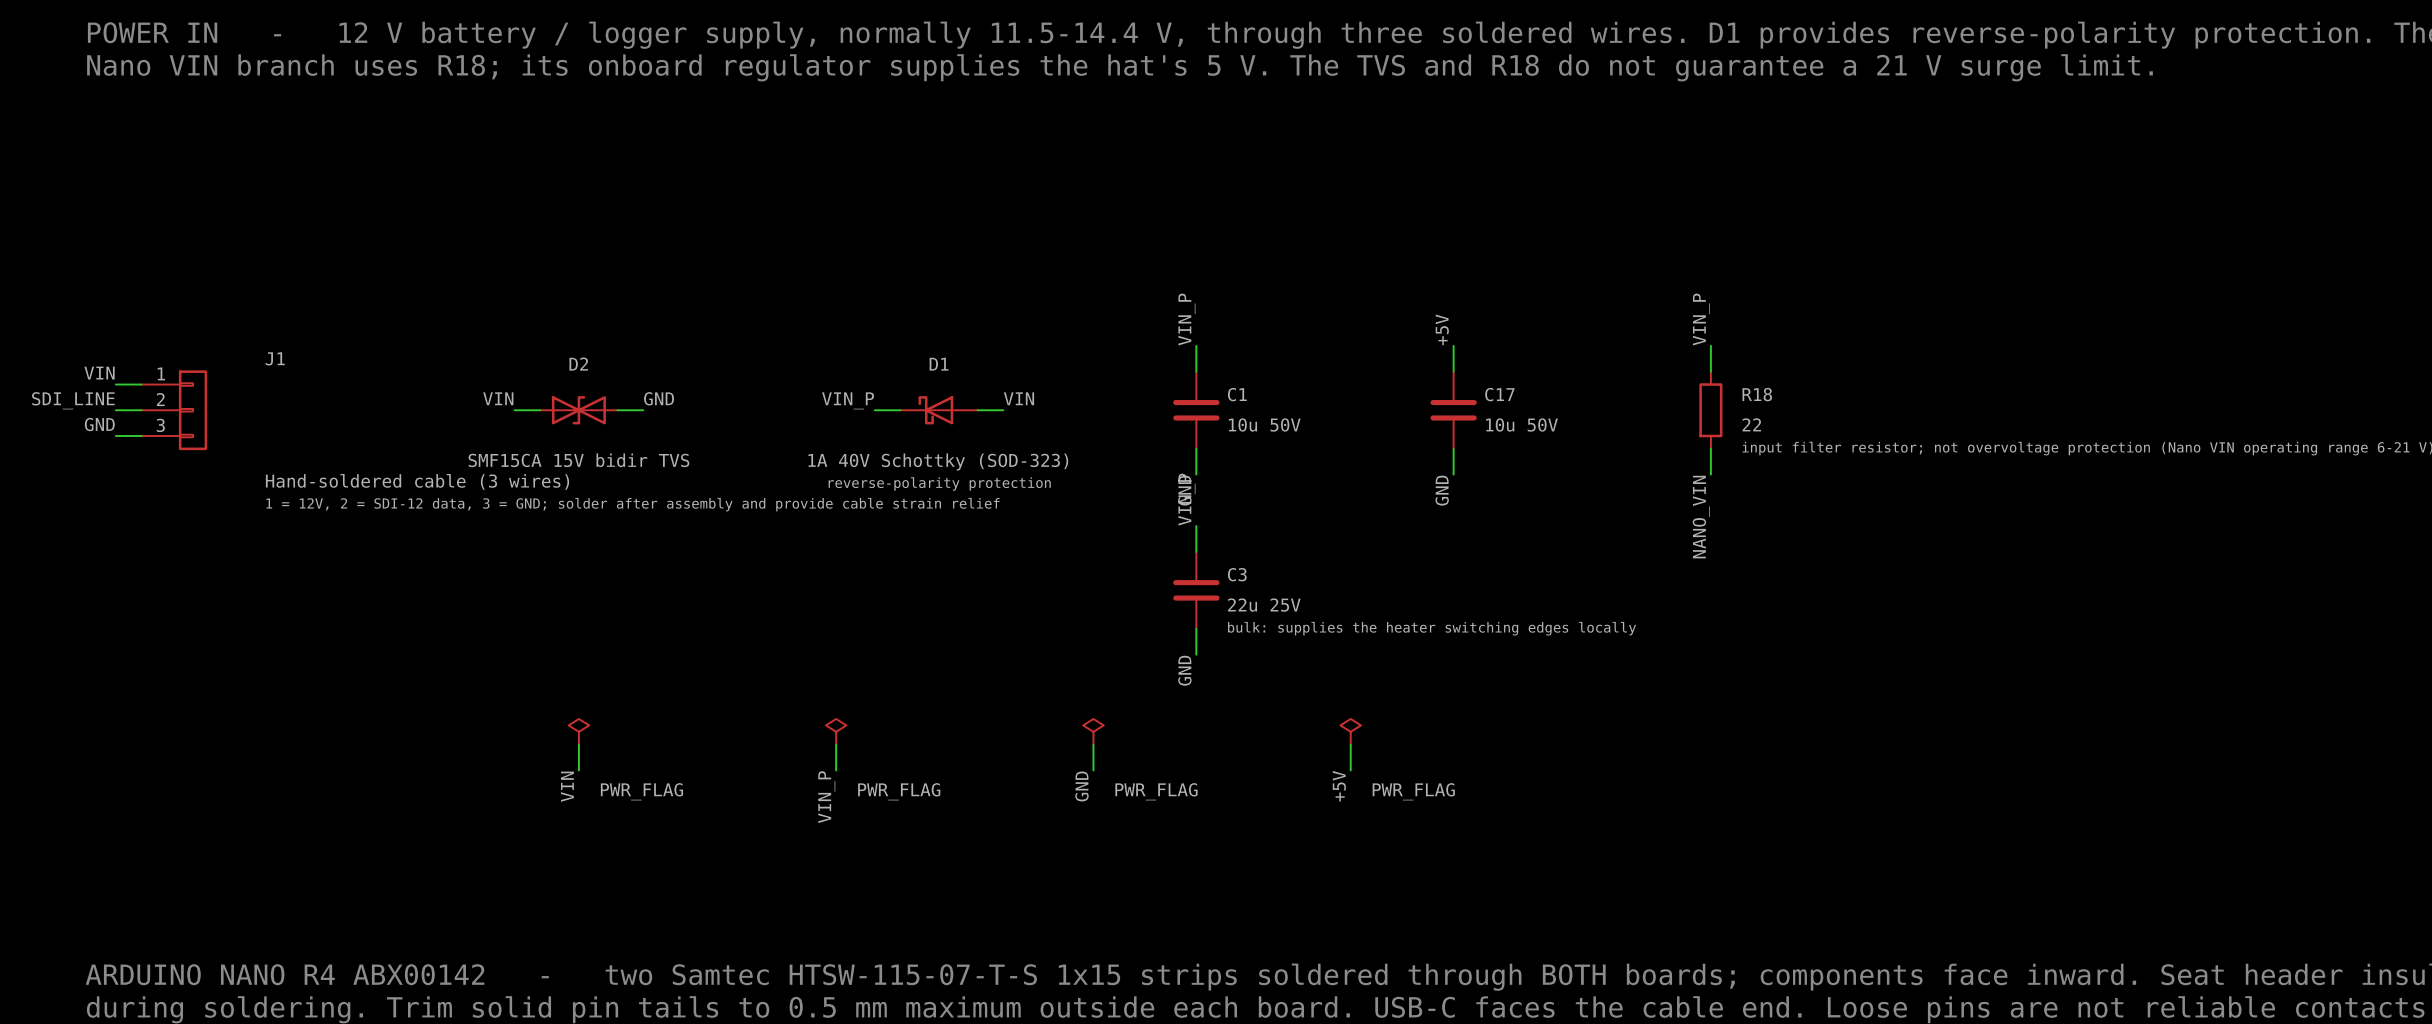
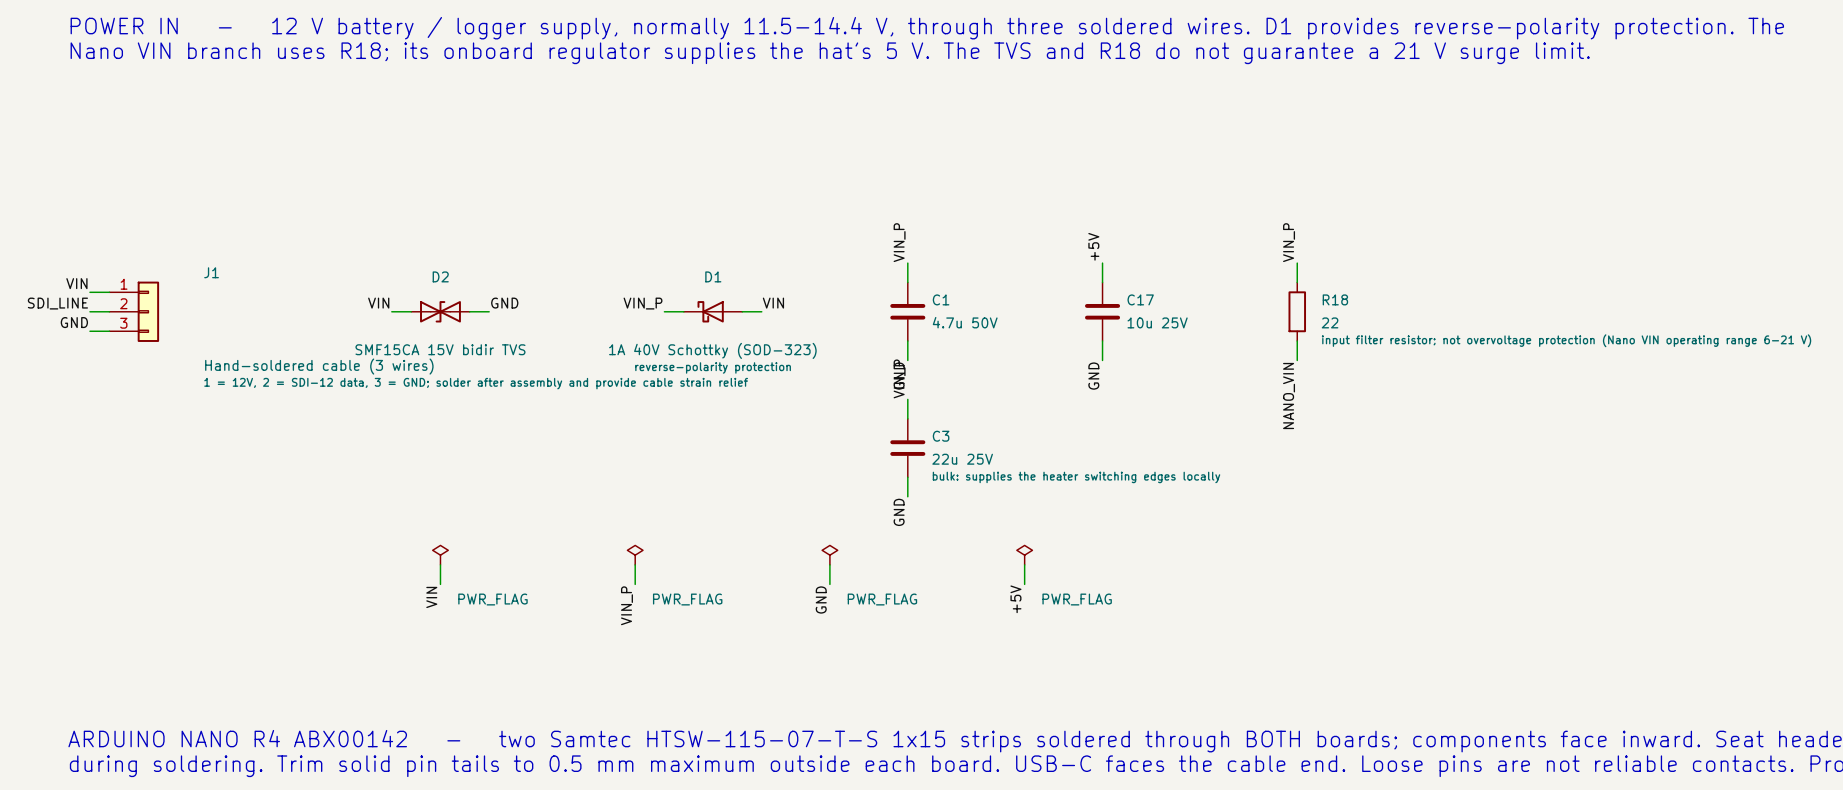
C1 value: 10u 50V (1264, 424) -> 4.7u 50V (965, 322)
C17 value: 10u 50V (1521, 424) -> 10u 25V (1157, 322)

